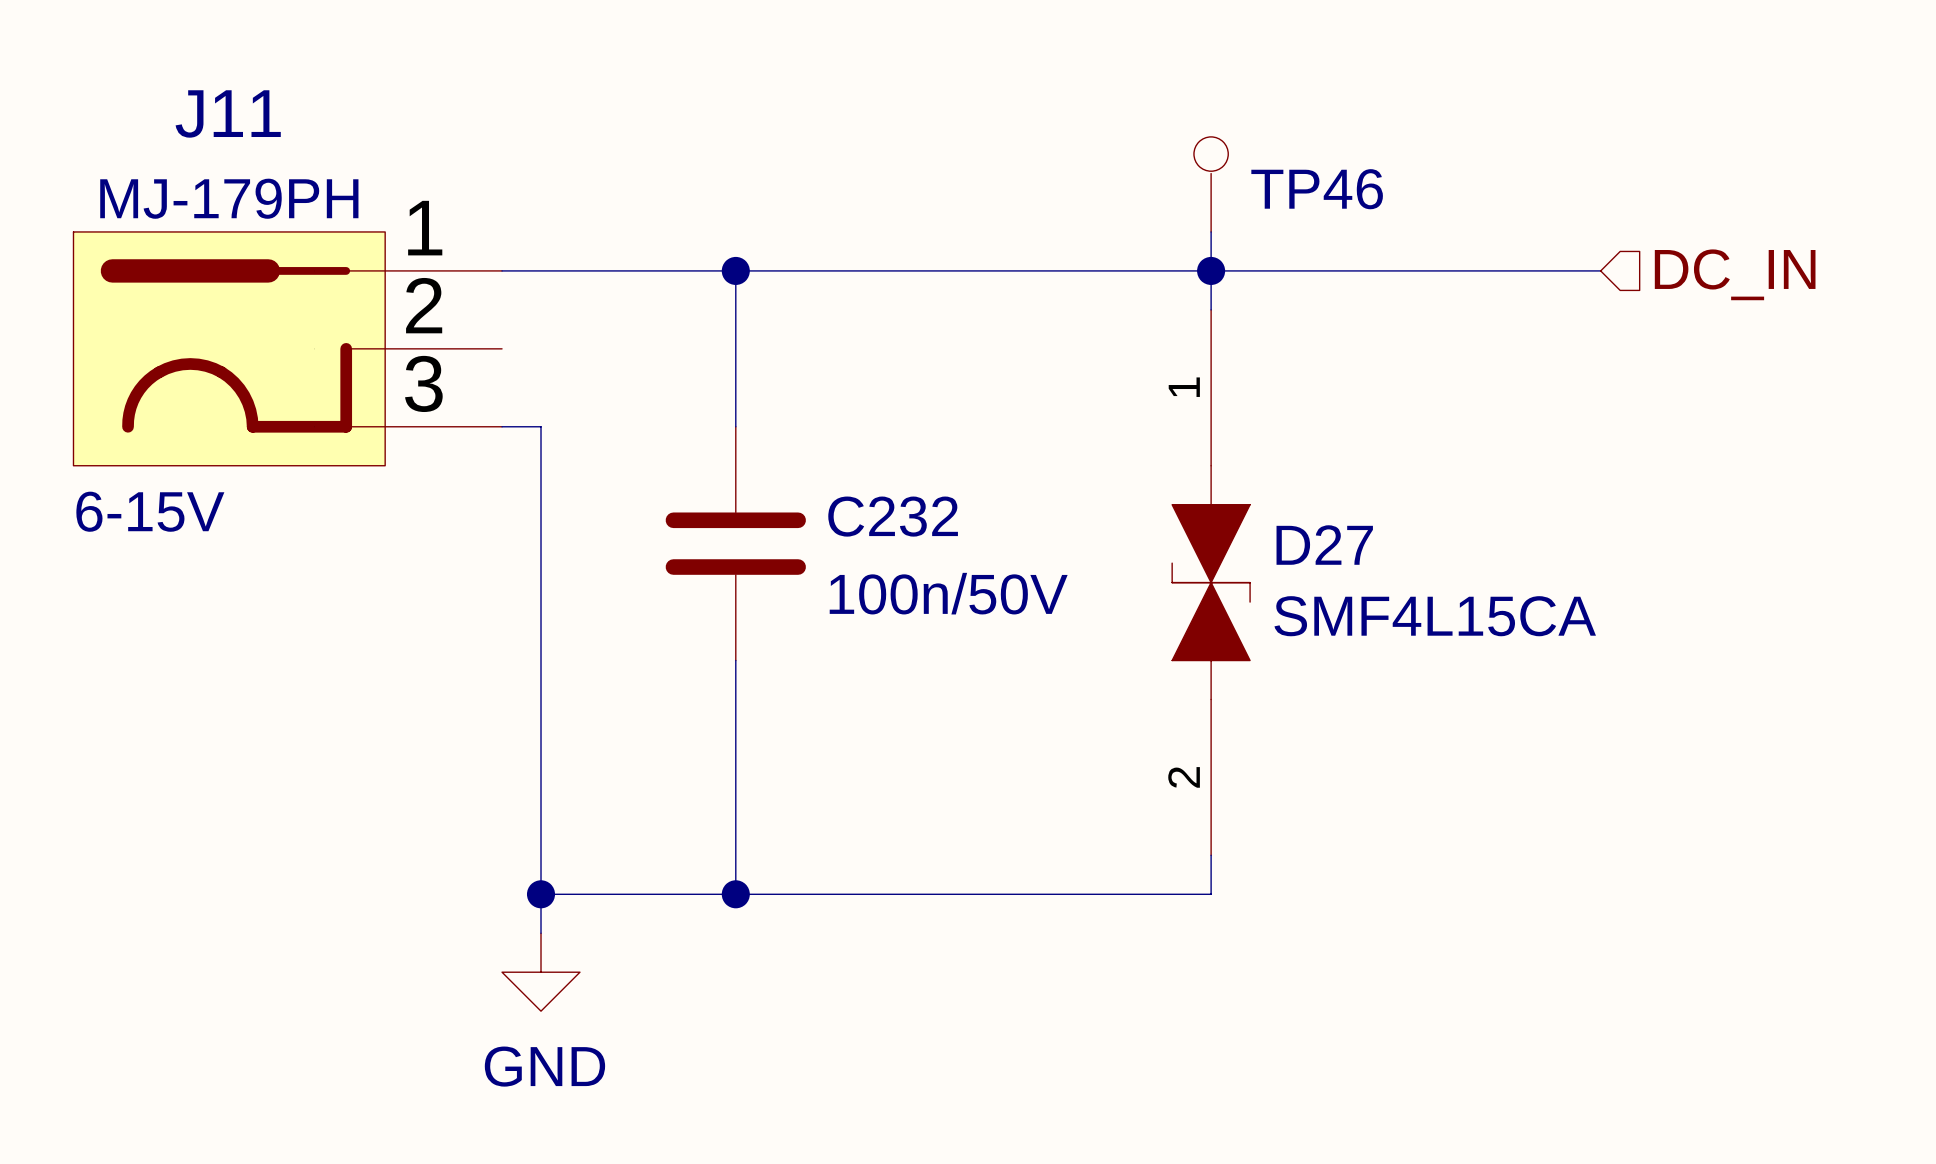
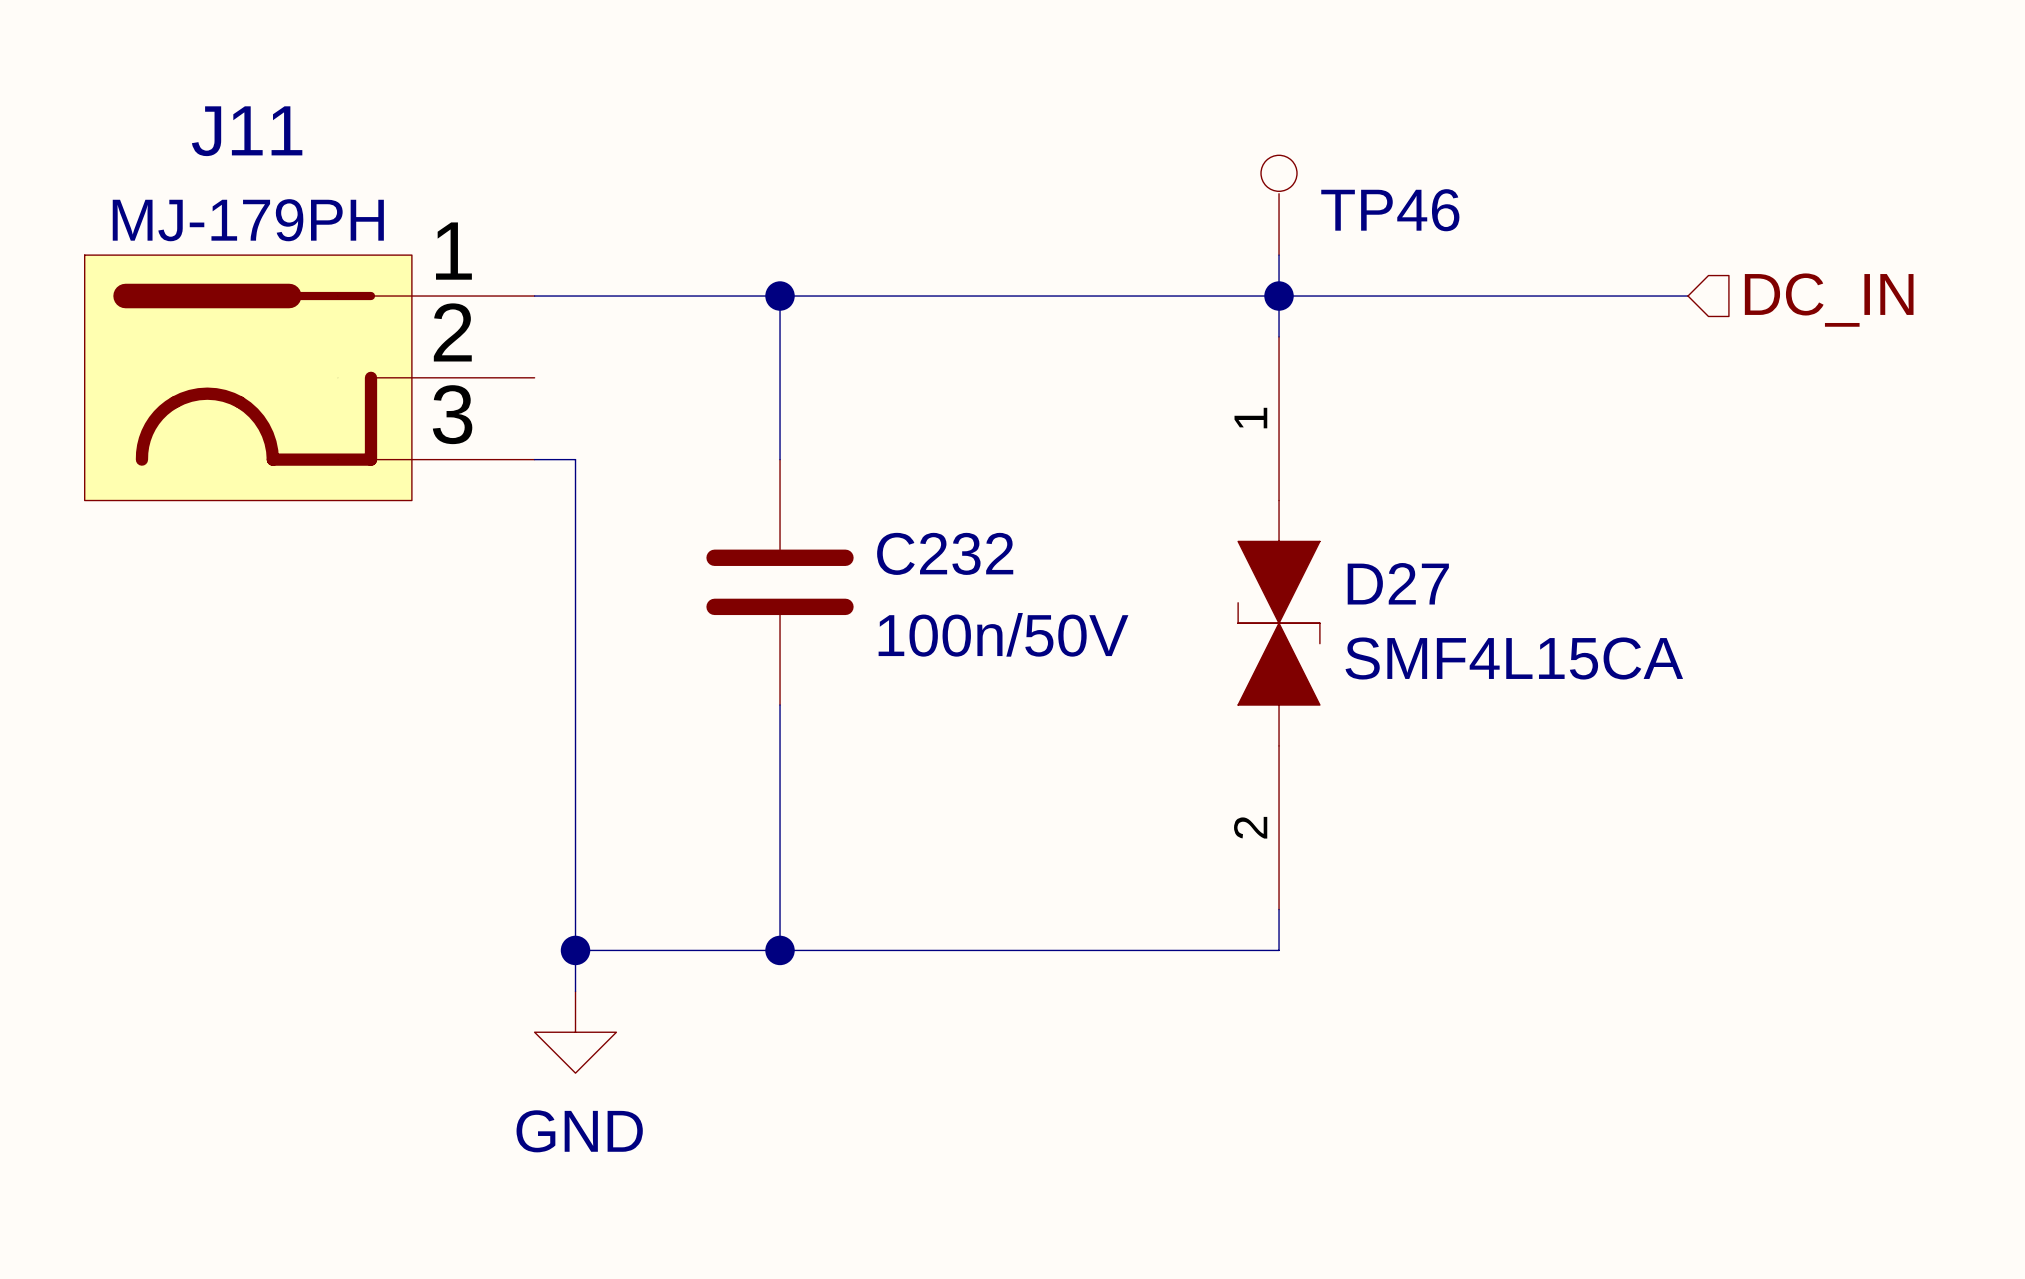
text: 6-15V (150, 511) -> none

